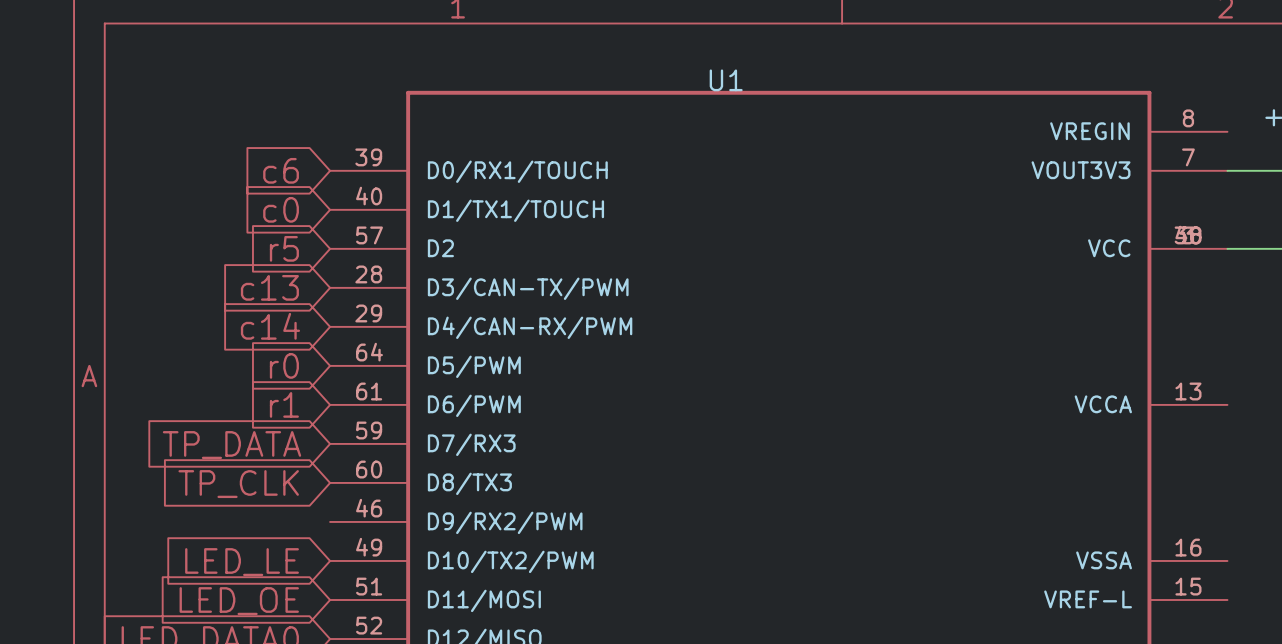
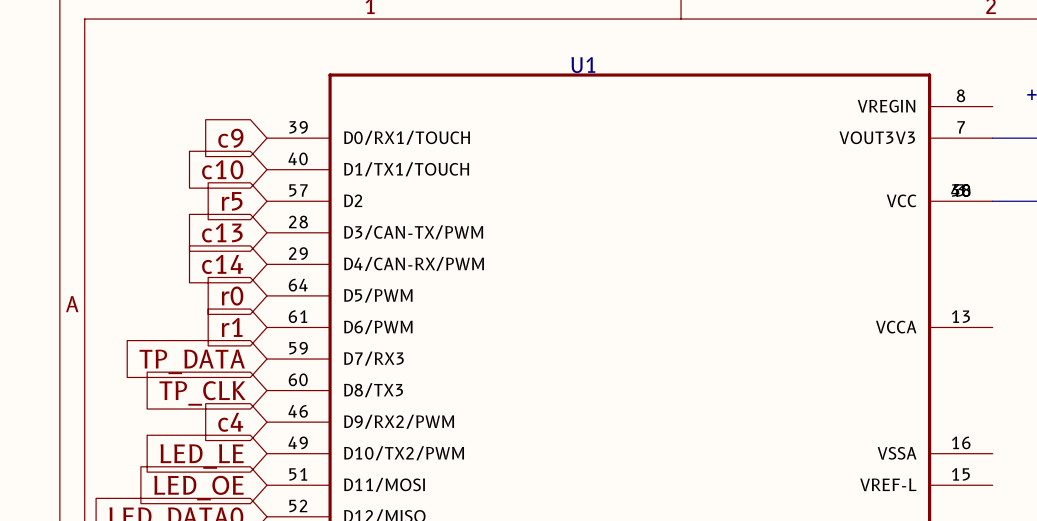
global label: c6 (281, 170) -> c9 (230, 138)
global label: c0 (281, 209) -> c10 (222, 169)
global label: none -> c4 (230, 422)

